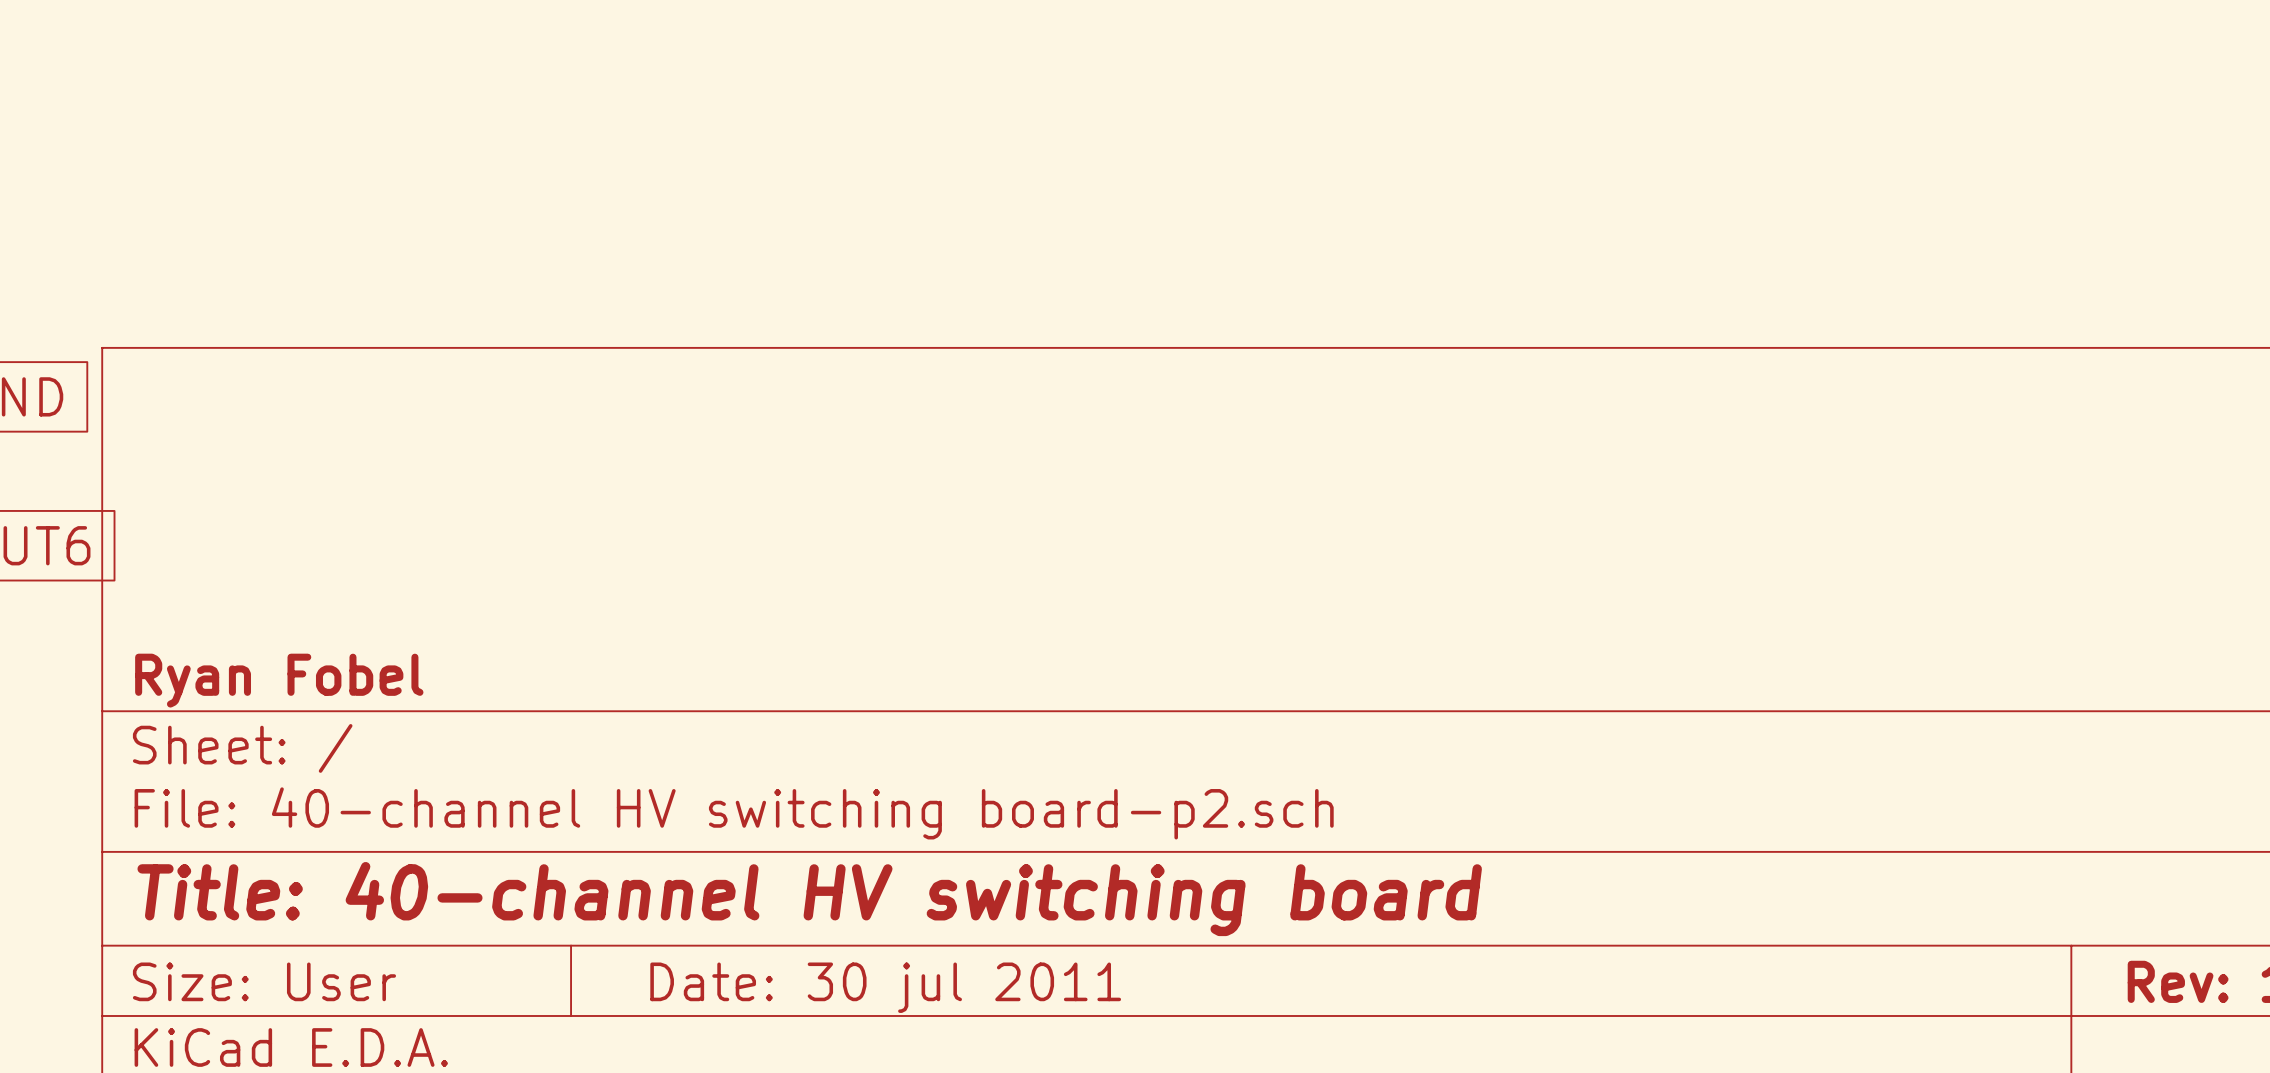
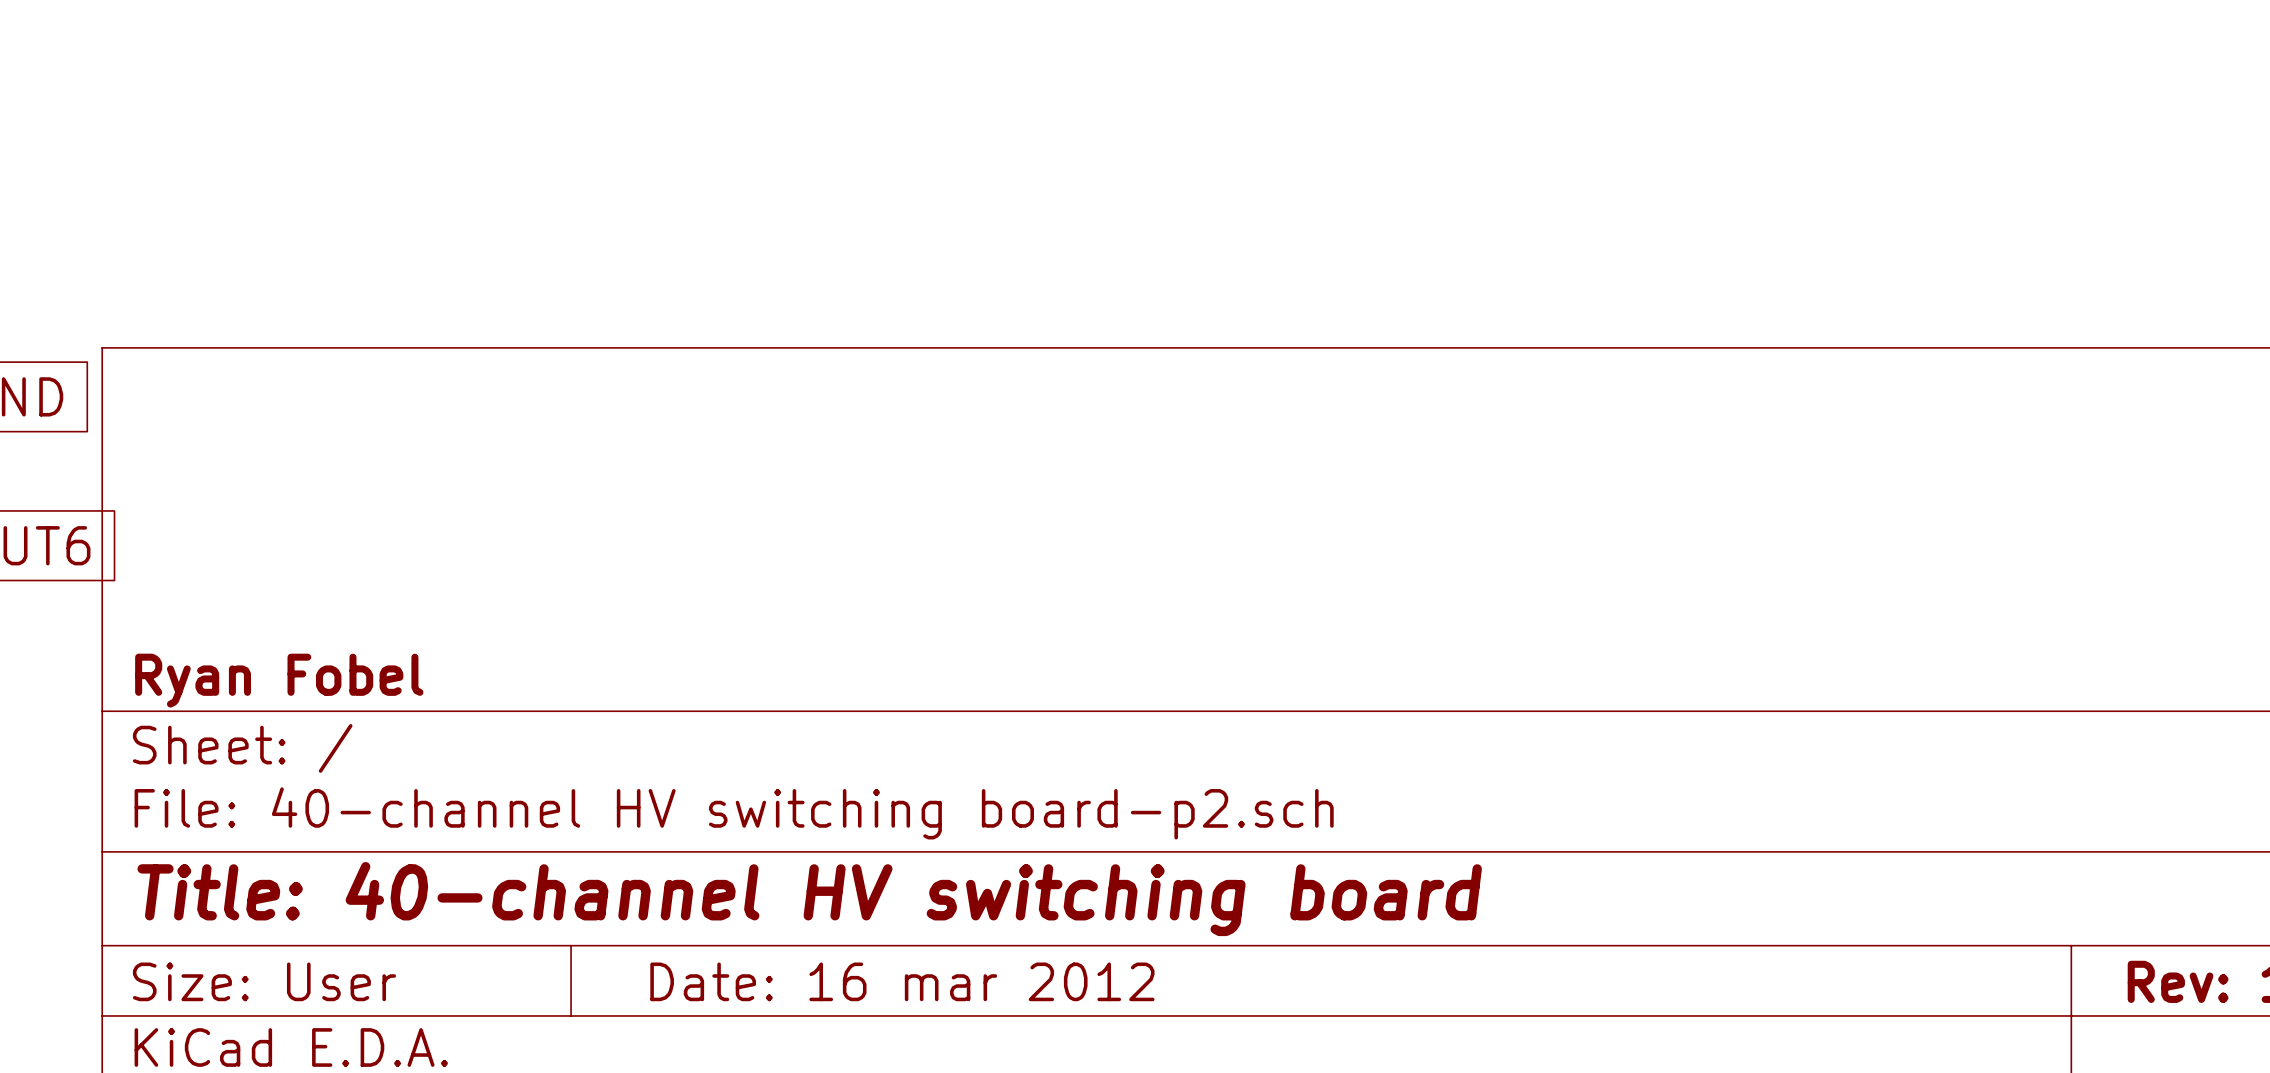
title block: Date: 30 jul 2011 (885, 987) -> Date: 16 mar 2012 (902, 981)

